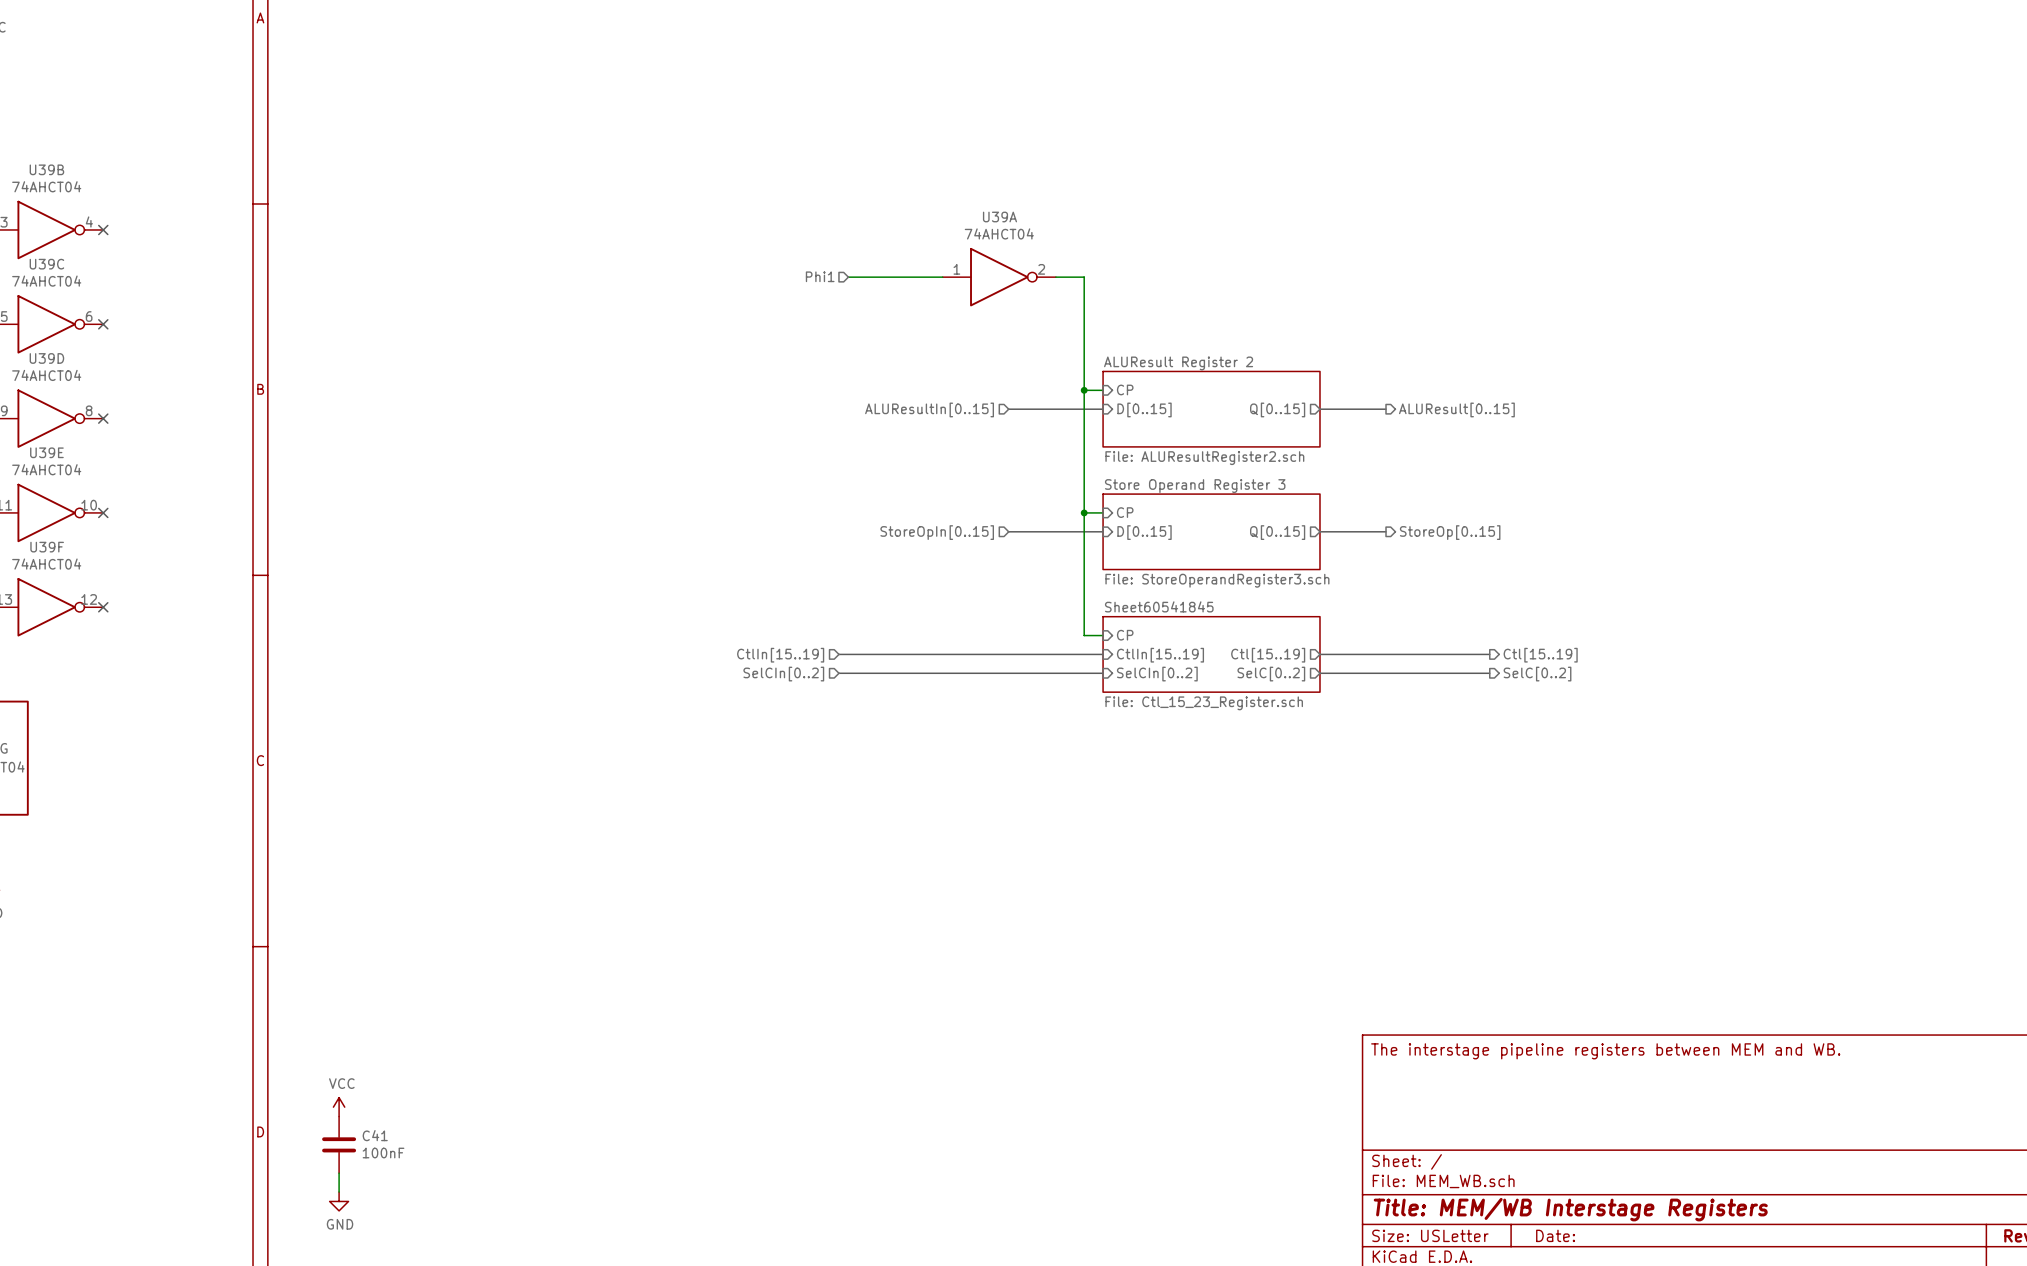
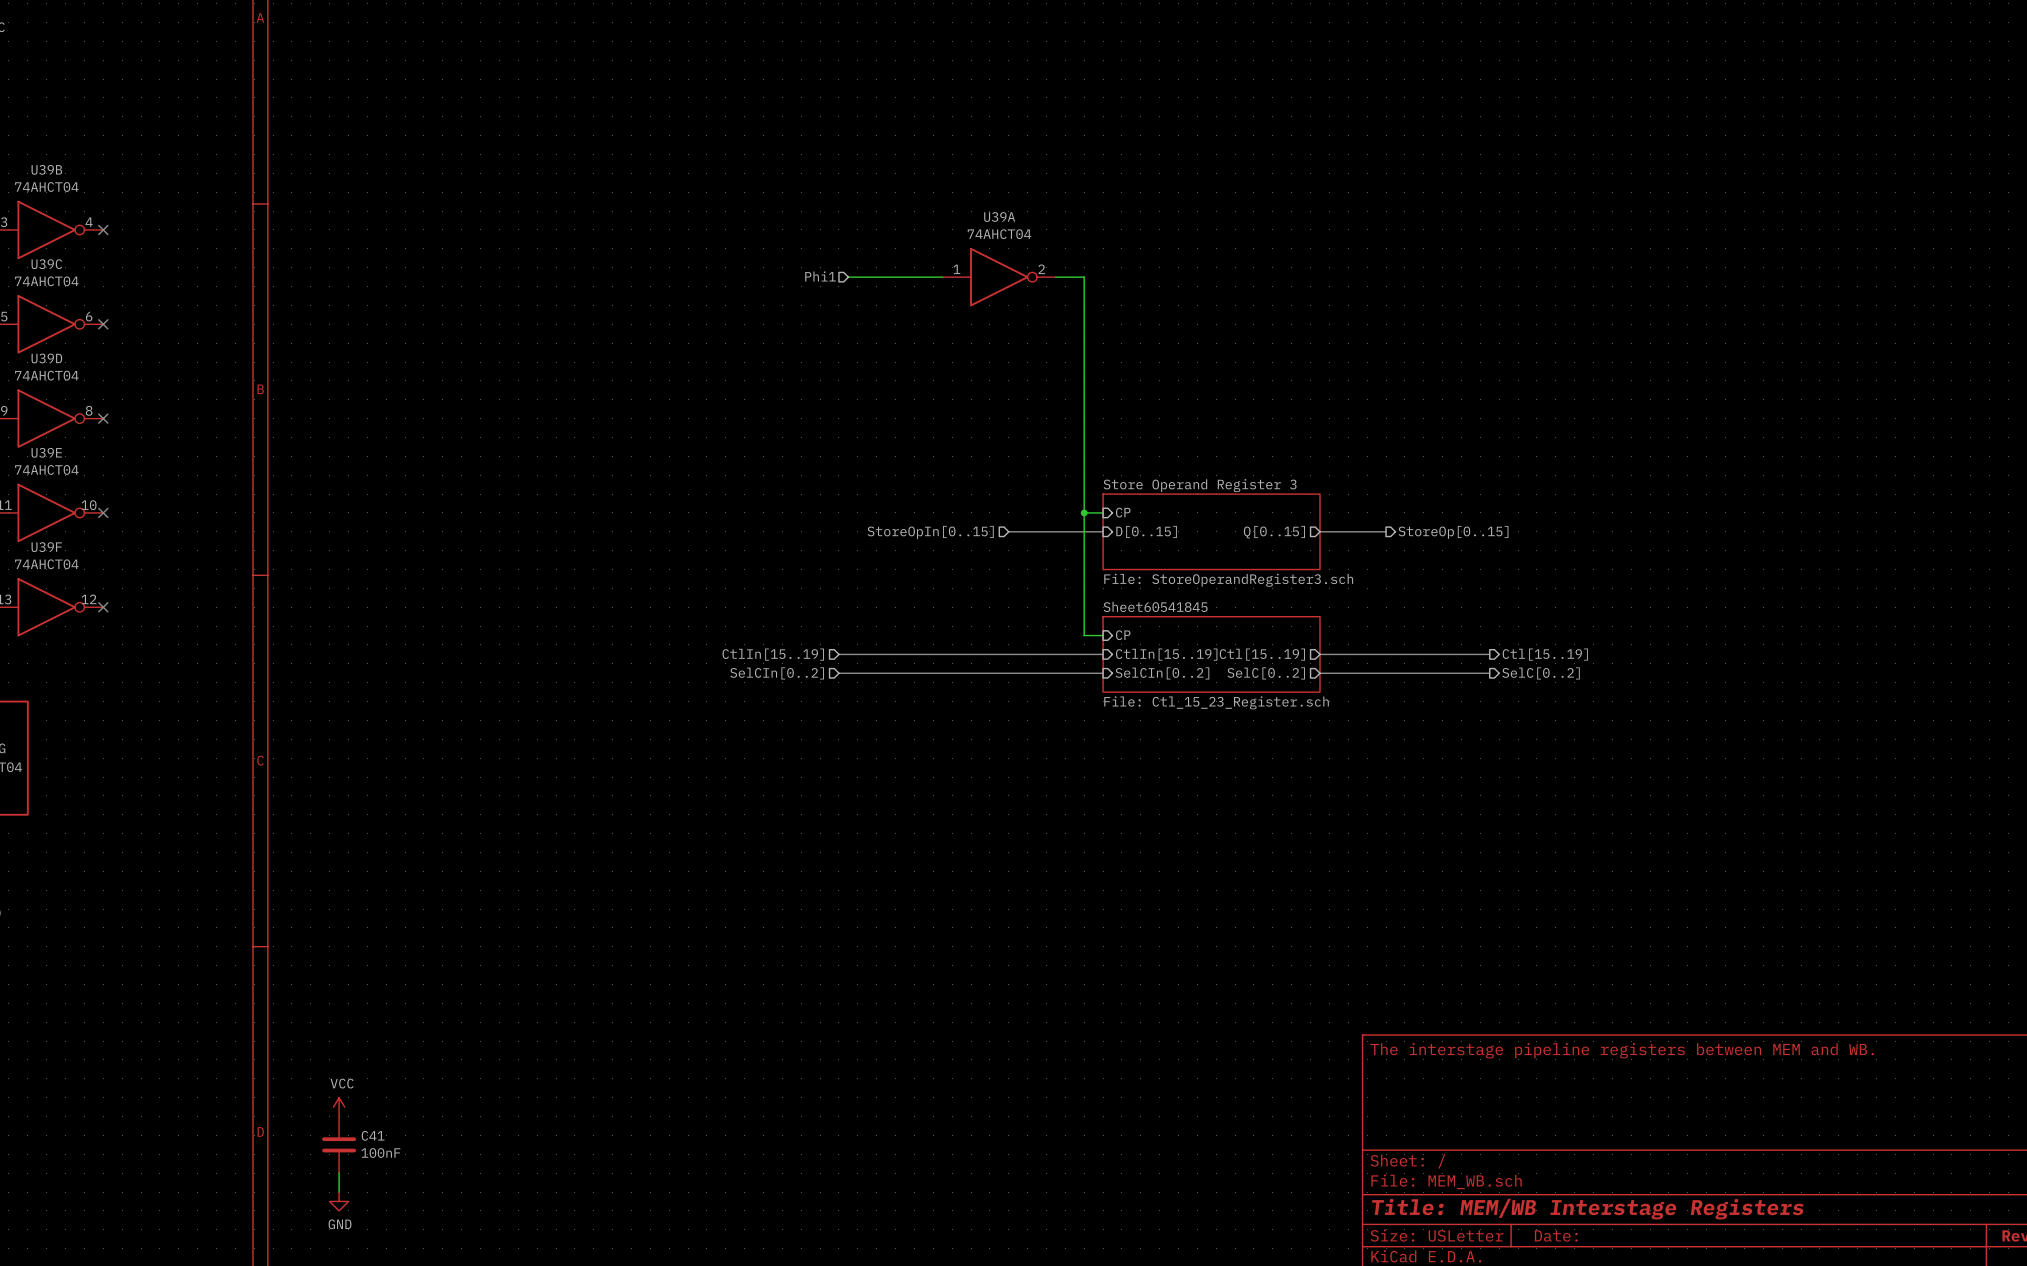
sheet pin: CP (1125, 389) -> none
wire: (1084, 390) (1103, 390) -> none
junction: (1084, 390) -> none
hierarchical label: ALUResultIn[0..15] (929, 409) -> none
bus: (1008, 409) (1103, 409) -> none
sheet pin: D[0..15] (1144, 409) -> none
sheet ALUResult Register 2: File: ALUResultRegister2.sch (1211, 409) -> none
sheet pin: Q[0..15] (1277, 409) -> none
bus: (1319, 409) (1386, 409) -> none
hierarchical label: ALUResult[0..15] (1456, 409) -> none

